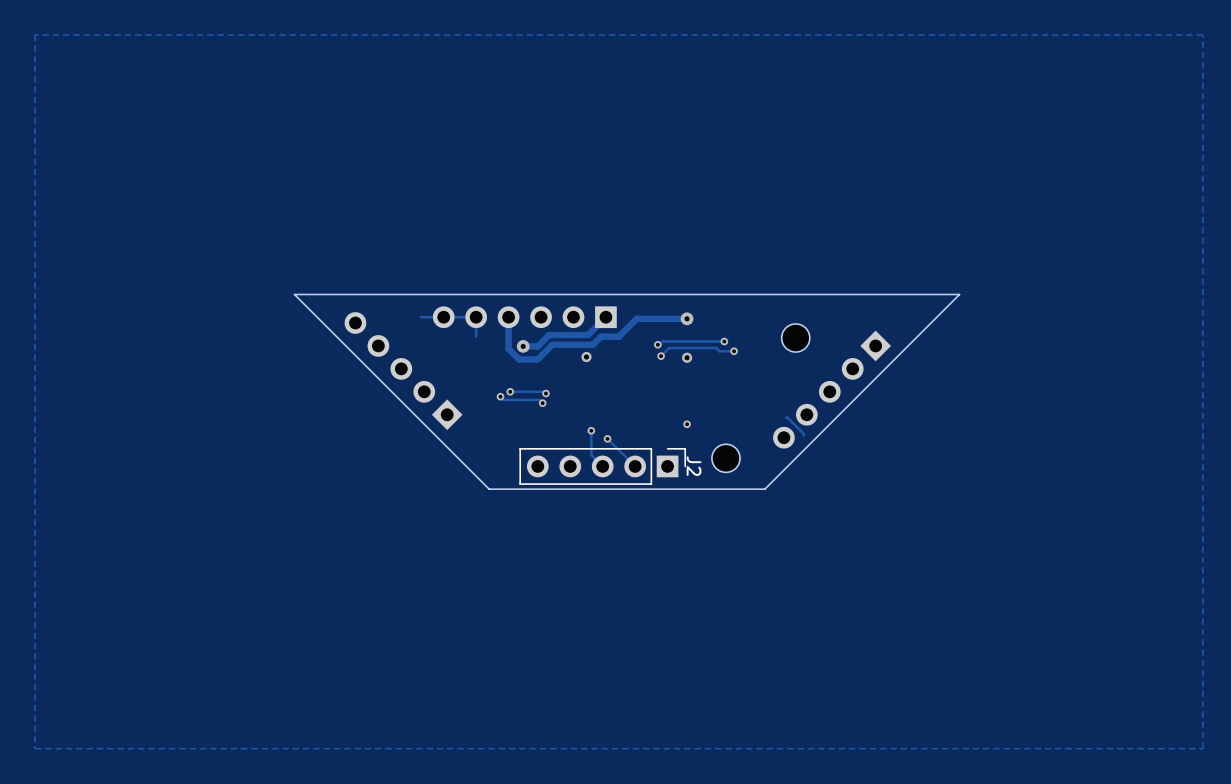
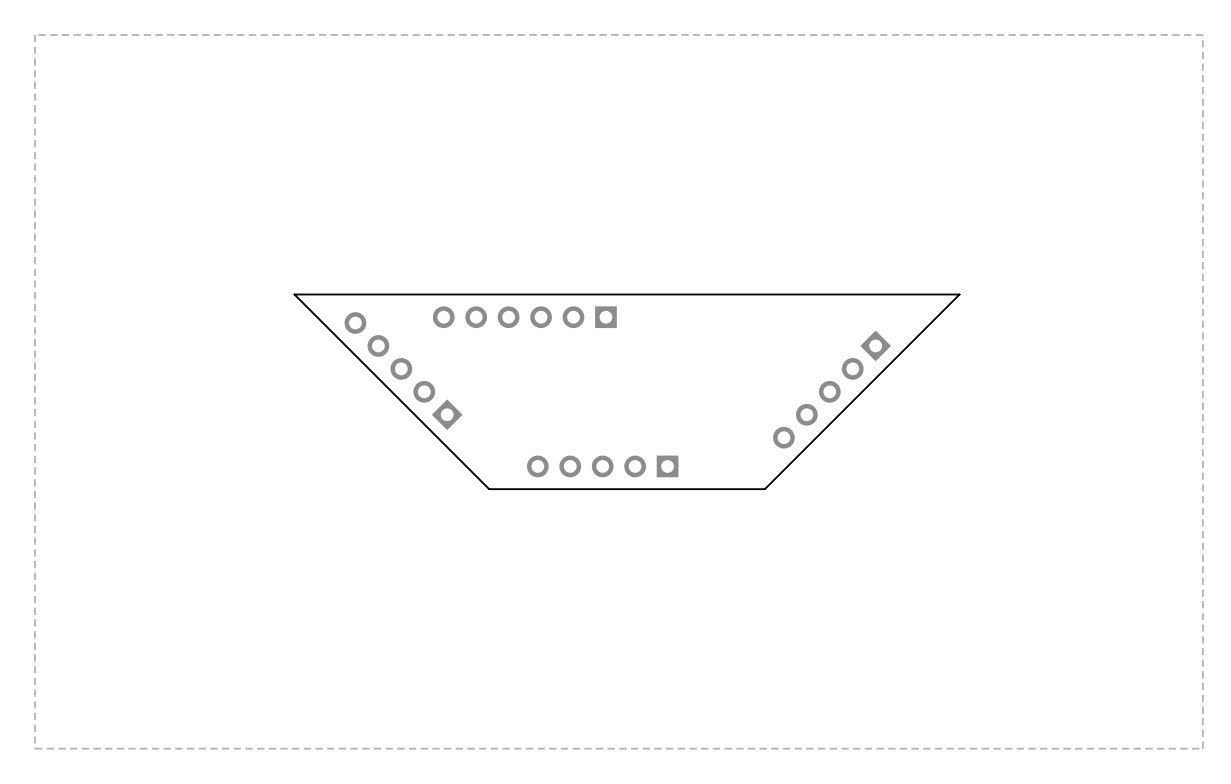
track: (421, 317) (476, 317) (476, 336) -> none
track: (508, 317) (508, 348) (519, 359) (537, 359) (552, 344) (592, 344) (601, 336) (618, 336) (636, 318) (687, 318) -> none
track: (605, 317) (588, 335) (549, 335) (537, 346) (523, 346) -> none
via: (687, 318) -> none
part: (795, 338) -> none
track: (724, 341) (662, 341) (657, 344) -> none
via: (724, 341) -> none
via: (657, 344) -> none
via: (523, 346) -> none
track: (734, 351) (719, 351) (716, 348) (669, 348) (661, 356) -> none
via: (734, 351) -> none
via: (661, 356) -> none
via: (586, 357) -> none
via: (687, 357) -> none
track: (510, 391) (544, 391) (545, 393) -> none
via: (510, 391) -> none
via: (545, 393) -> none
track: (500, 396) (503, 399) (539, 399) (542, 403) -> none
via: (500, 396) -> none
via: (542, 403) -> none
track: (786, 417) (803, 435) -> none
via: (687, 424) -> none
track: (591, 430) (591, 455) (602, 466) -> none
via: (591, 430) -> none
track: (607, 438) (635, 466) -> none
via: (607, 438) -> none
part: (725, 458) -> none
J2 side: bottom (602, 466) -> top (602, 466)

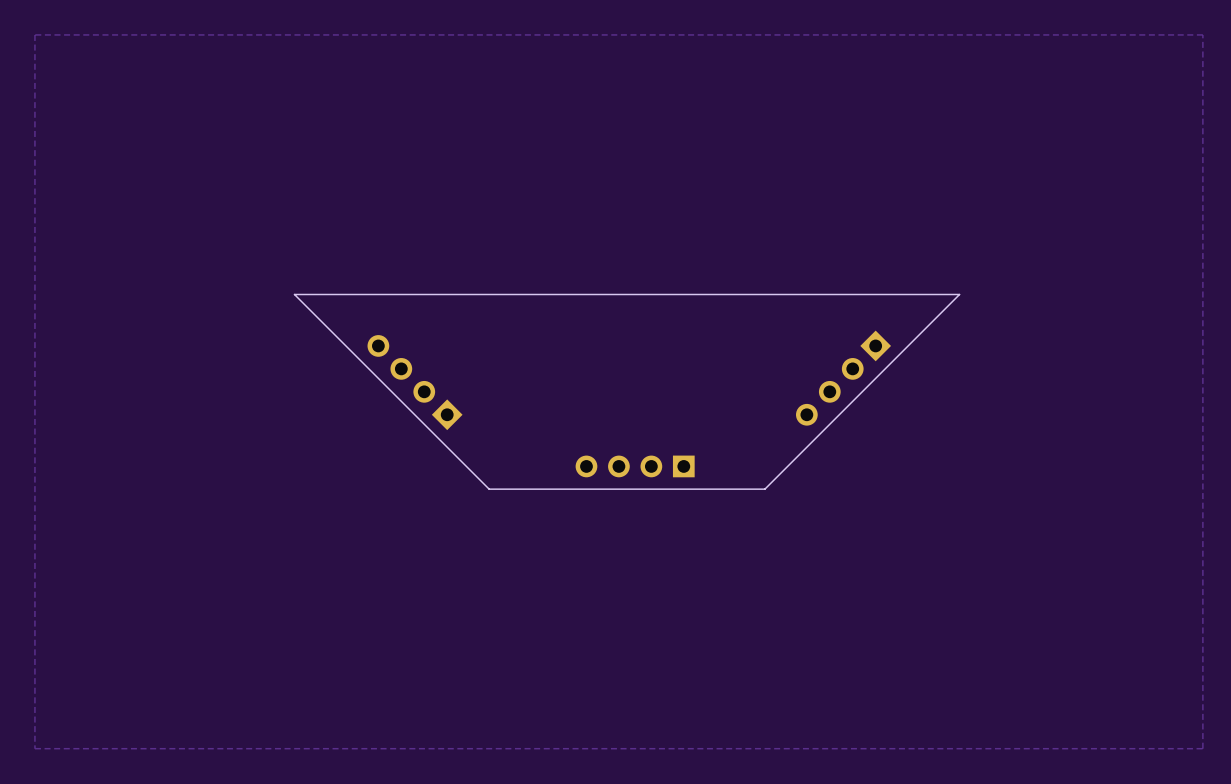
part: (524, 317) -> none
part: (403, 371) -> none
part: (832, 389) -> none
part: (602, 466) -> none
part: none -> (635, 466)

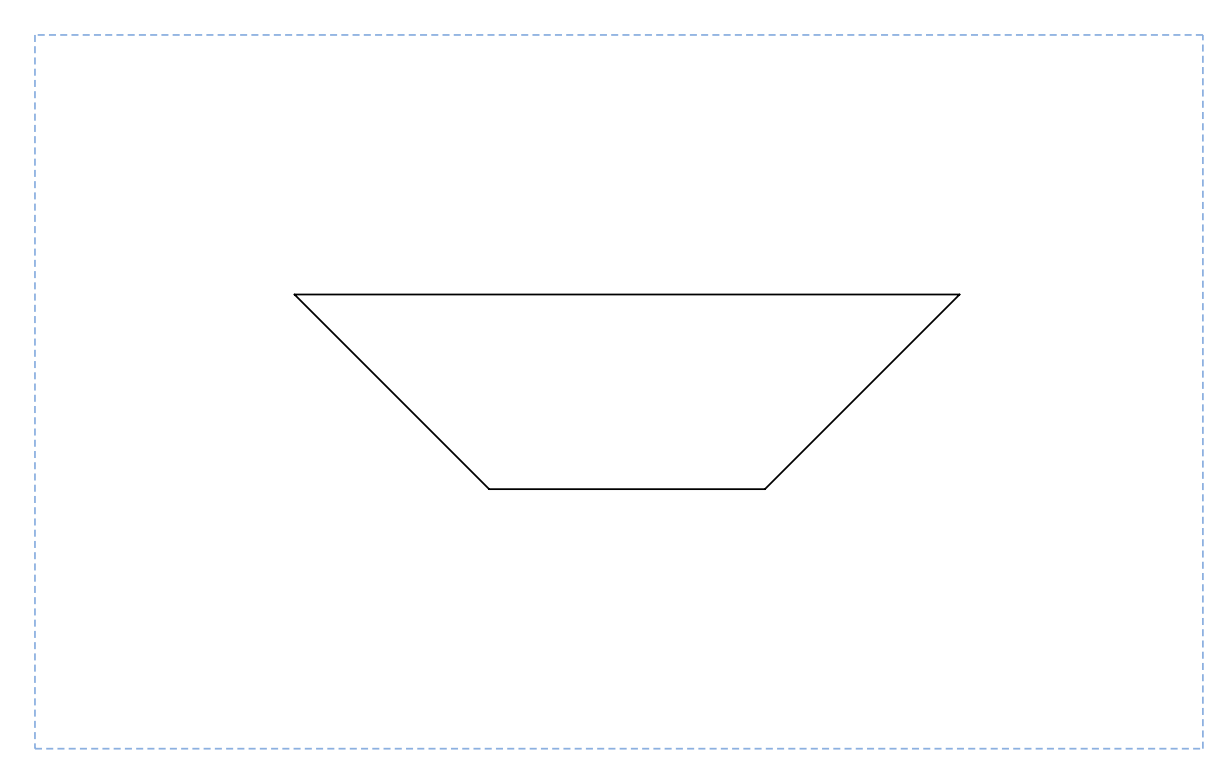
part: (843, 378) -> none
part: (415, 382) -> none
part: (635, 466) -> none

